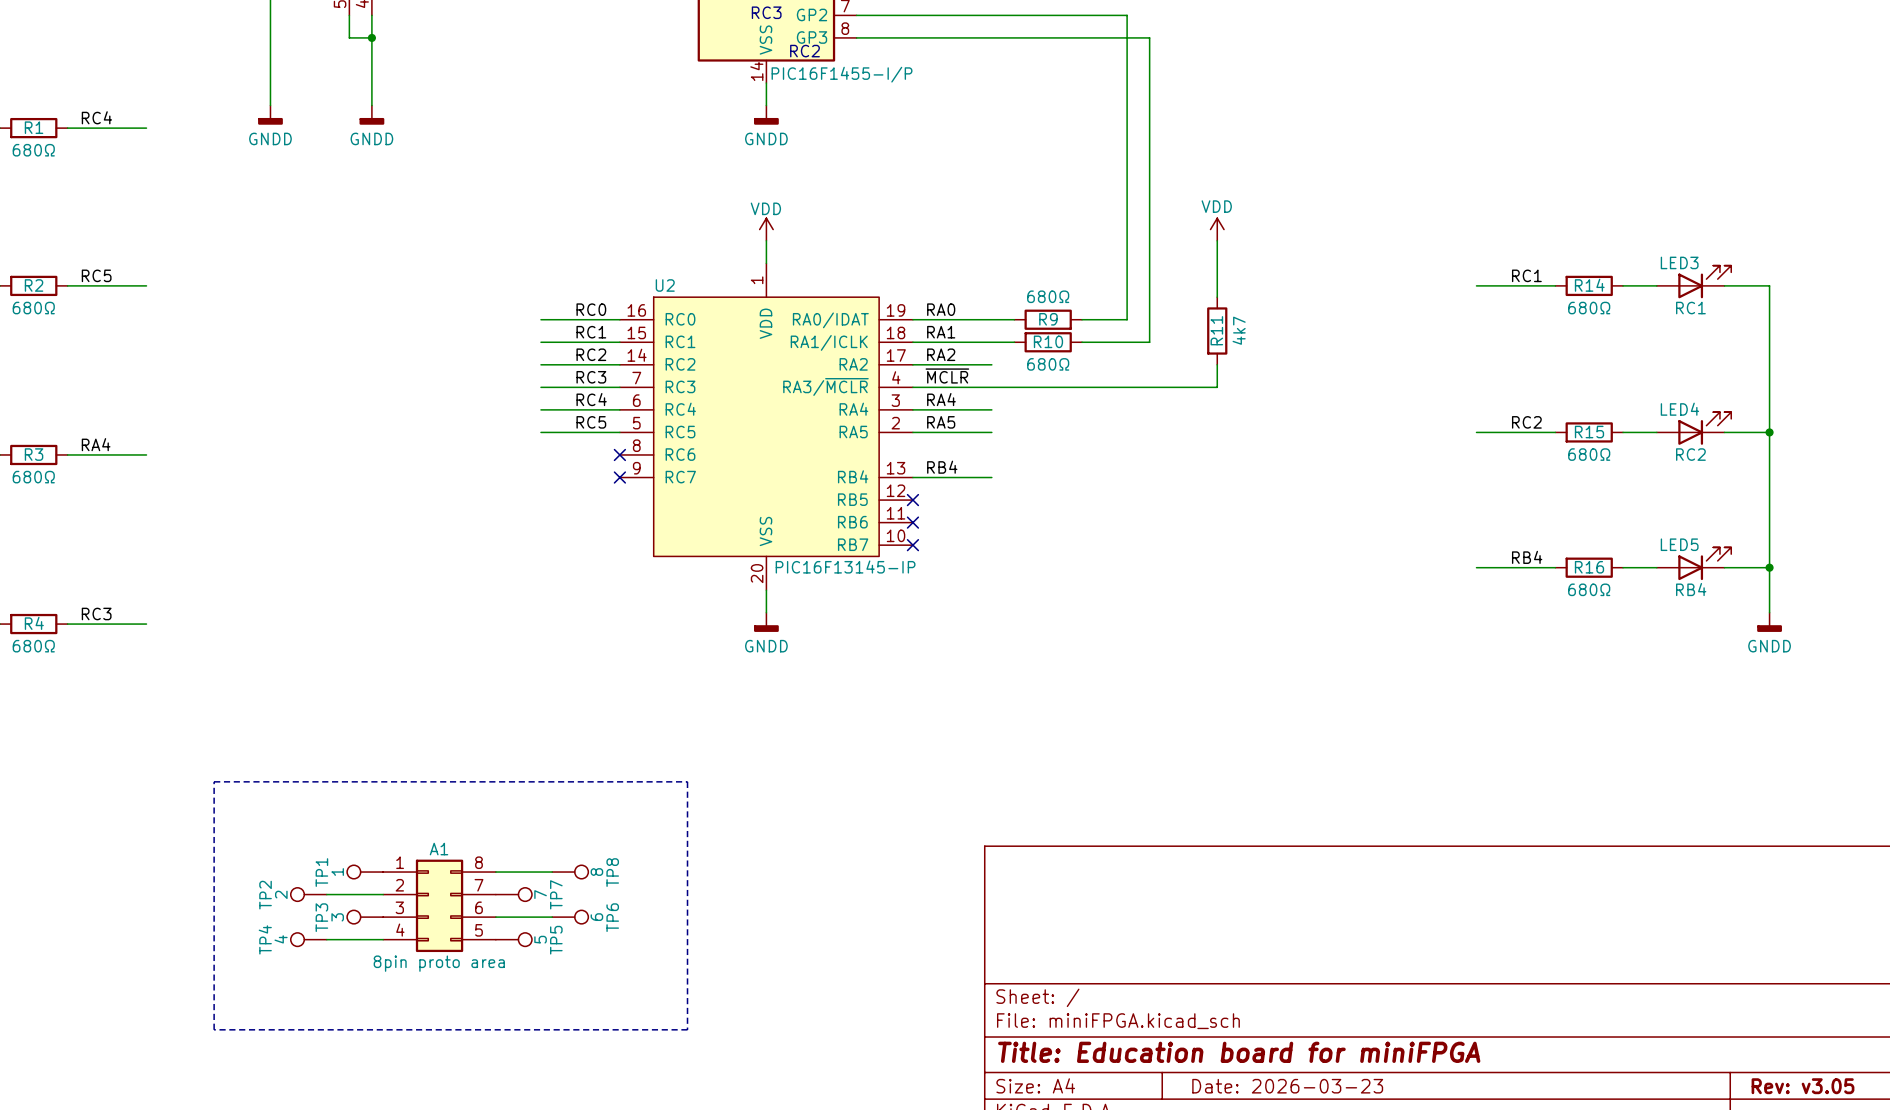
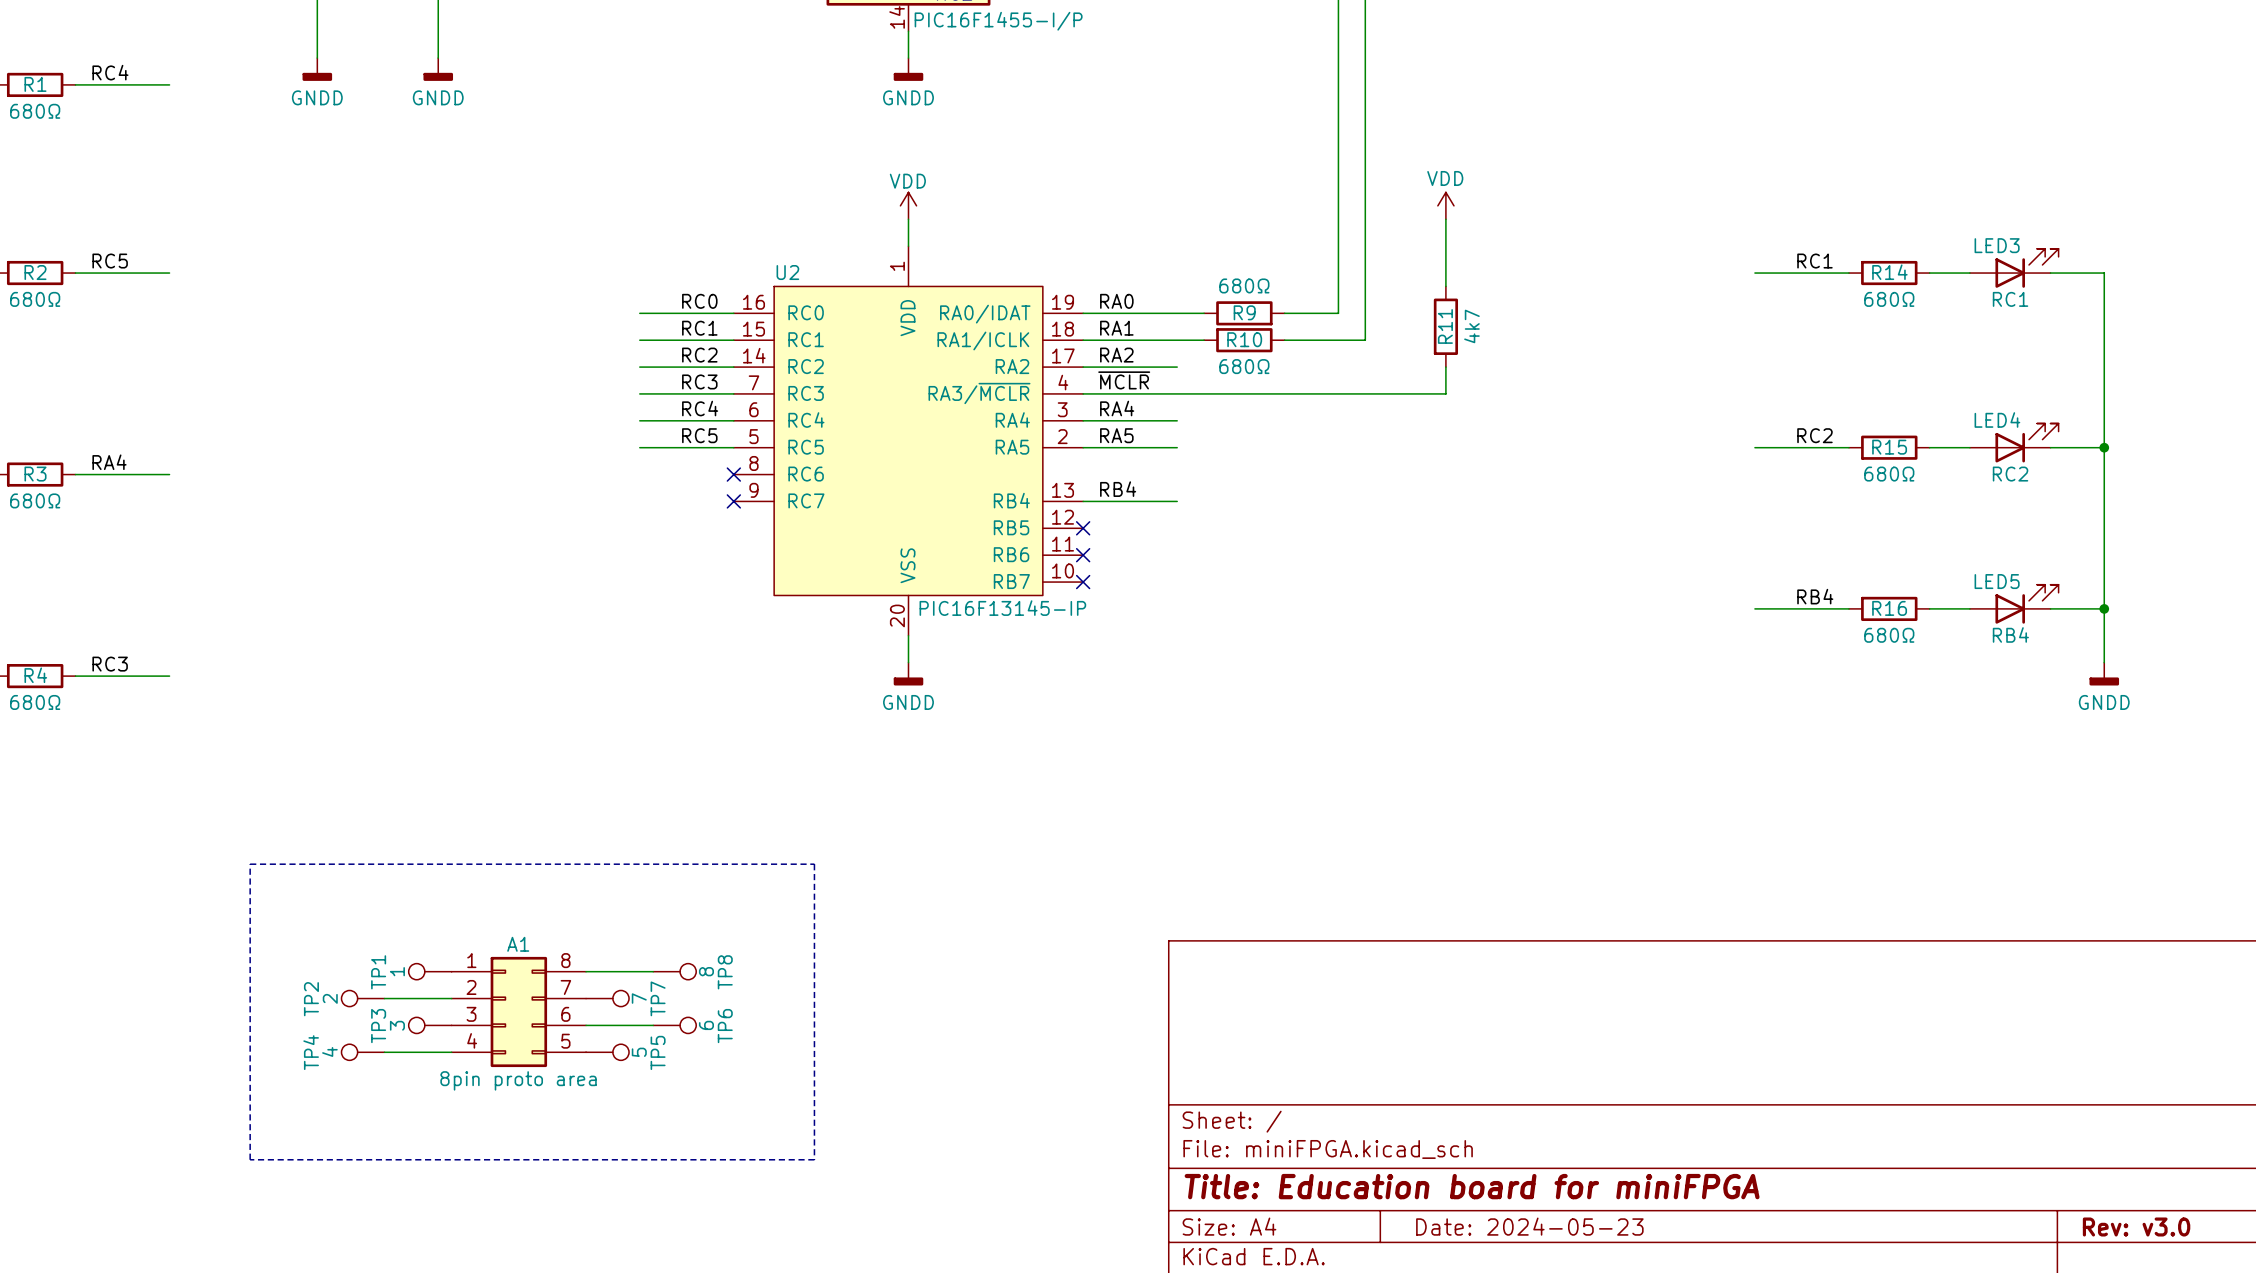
title block: Date: 2026-03-23 (1287, 1086) -> Date: 2024-05-23 (1529, 1226)
title block: Rev: v3.05 (1802, 1086) -> Rev: v3.0 (2136, 1227)

